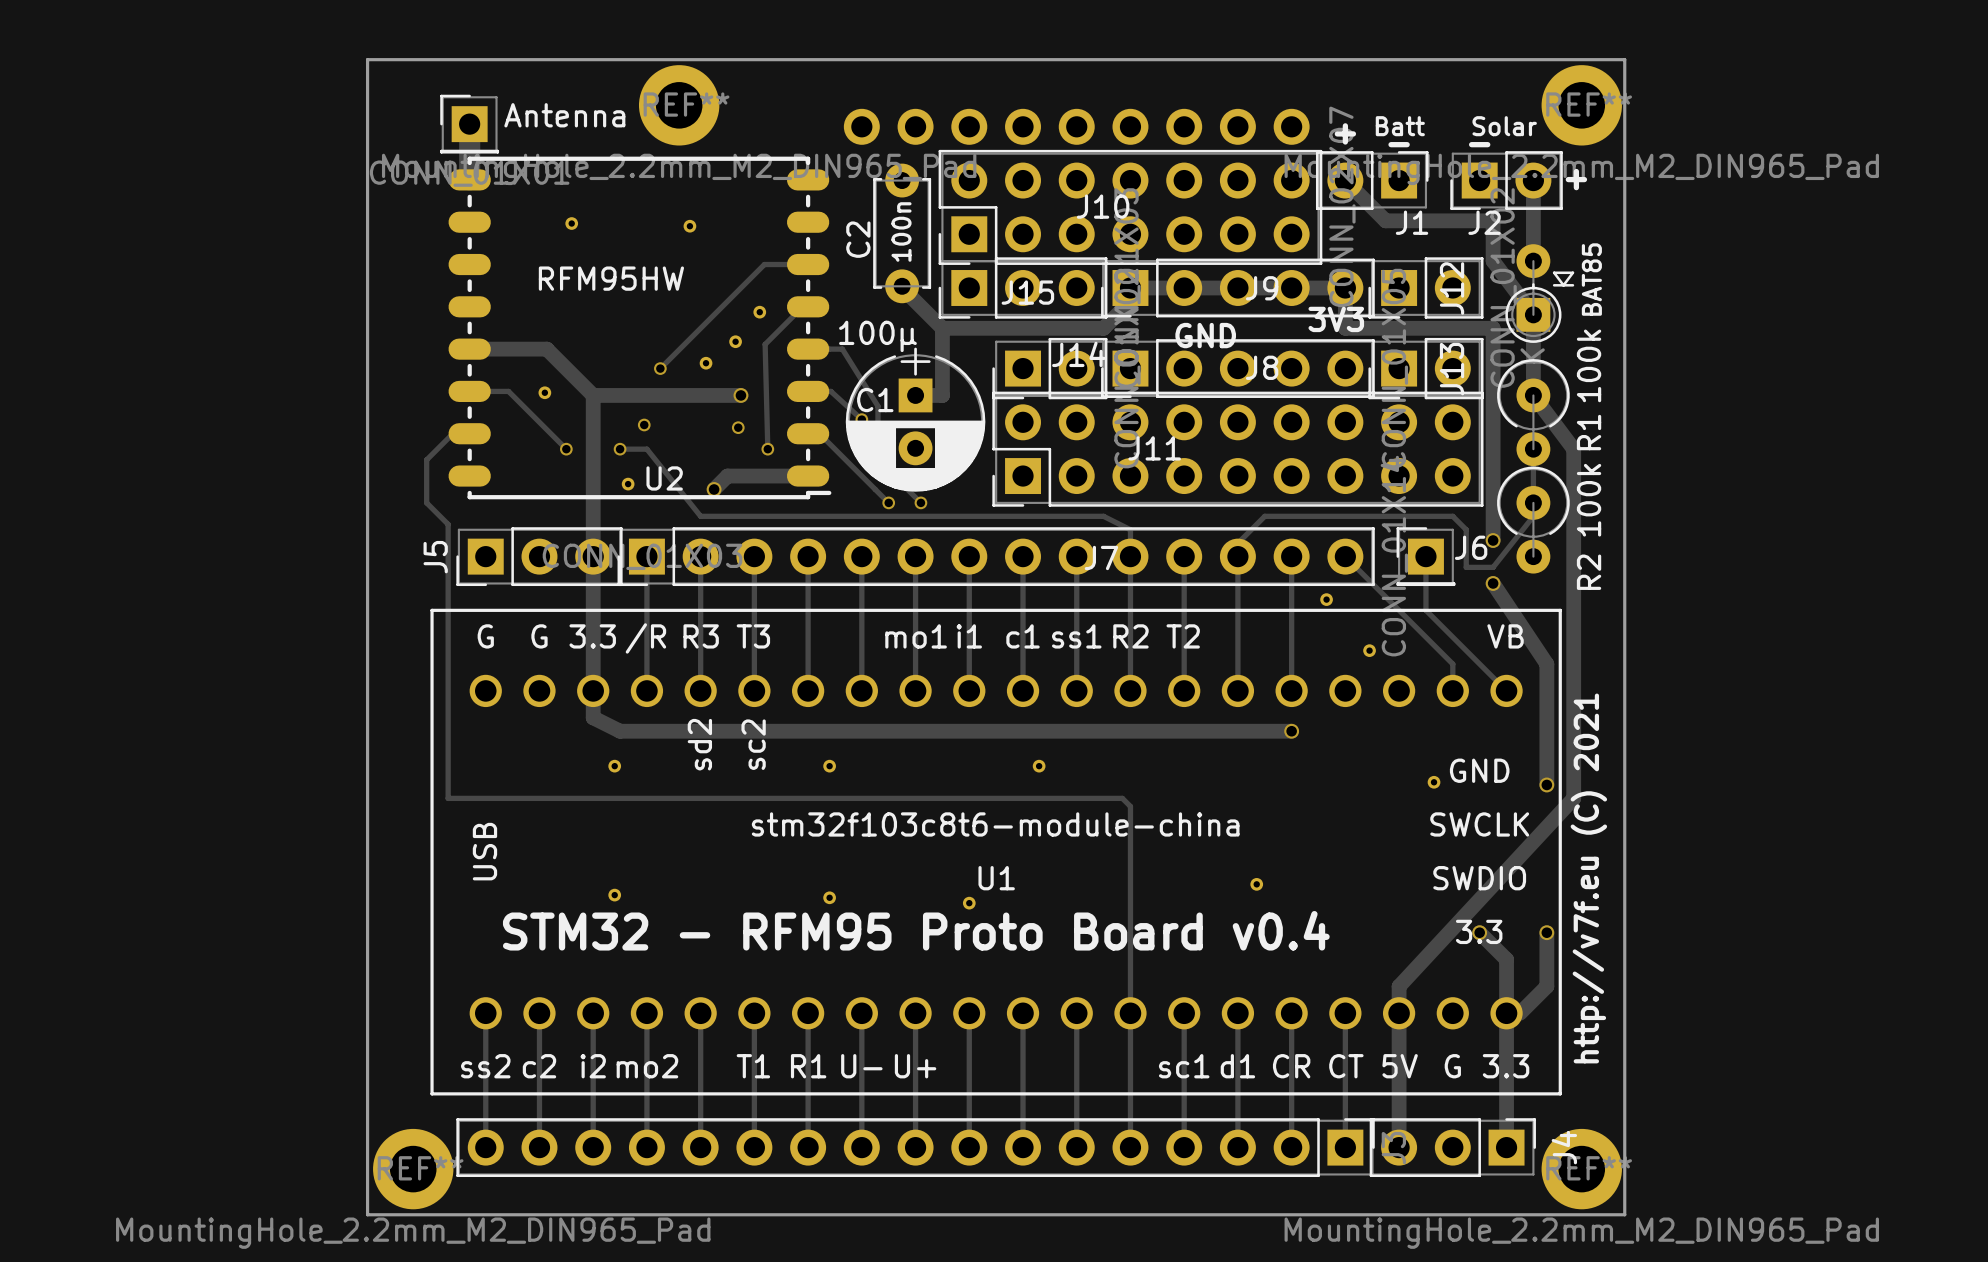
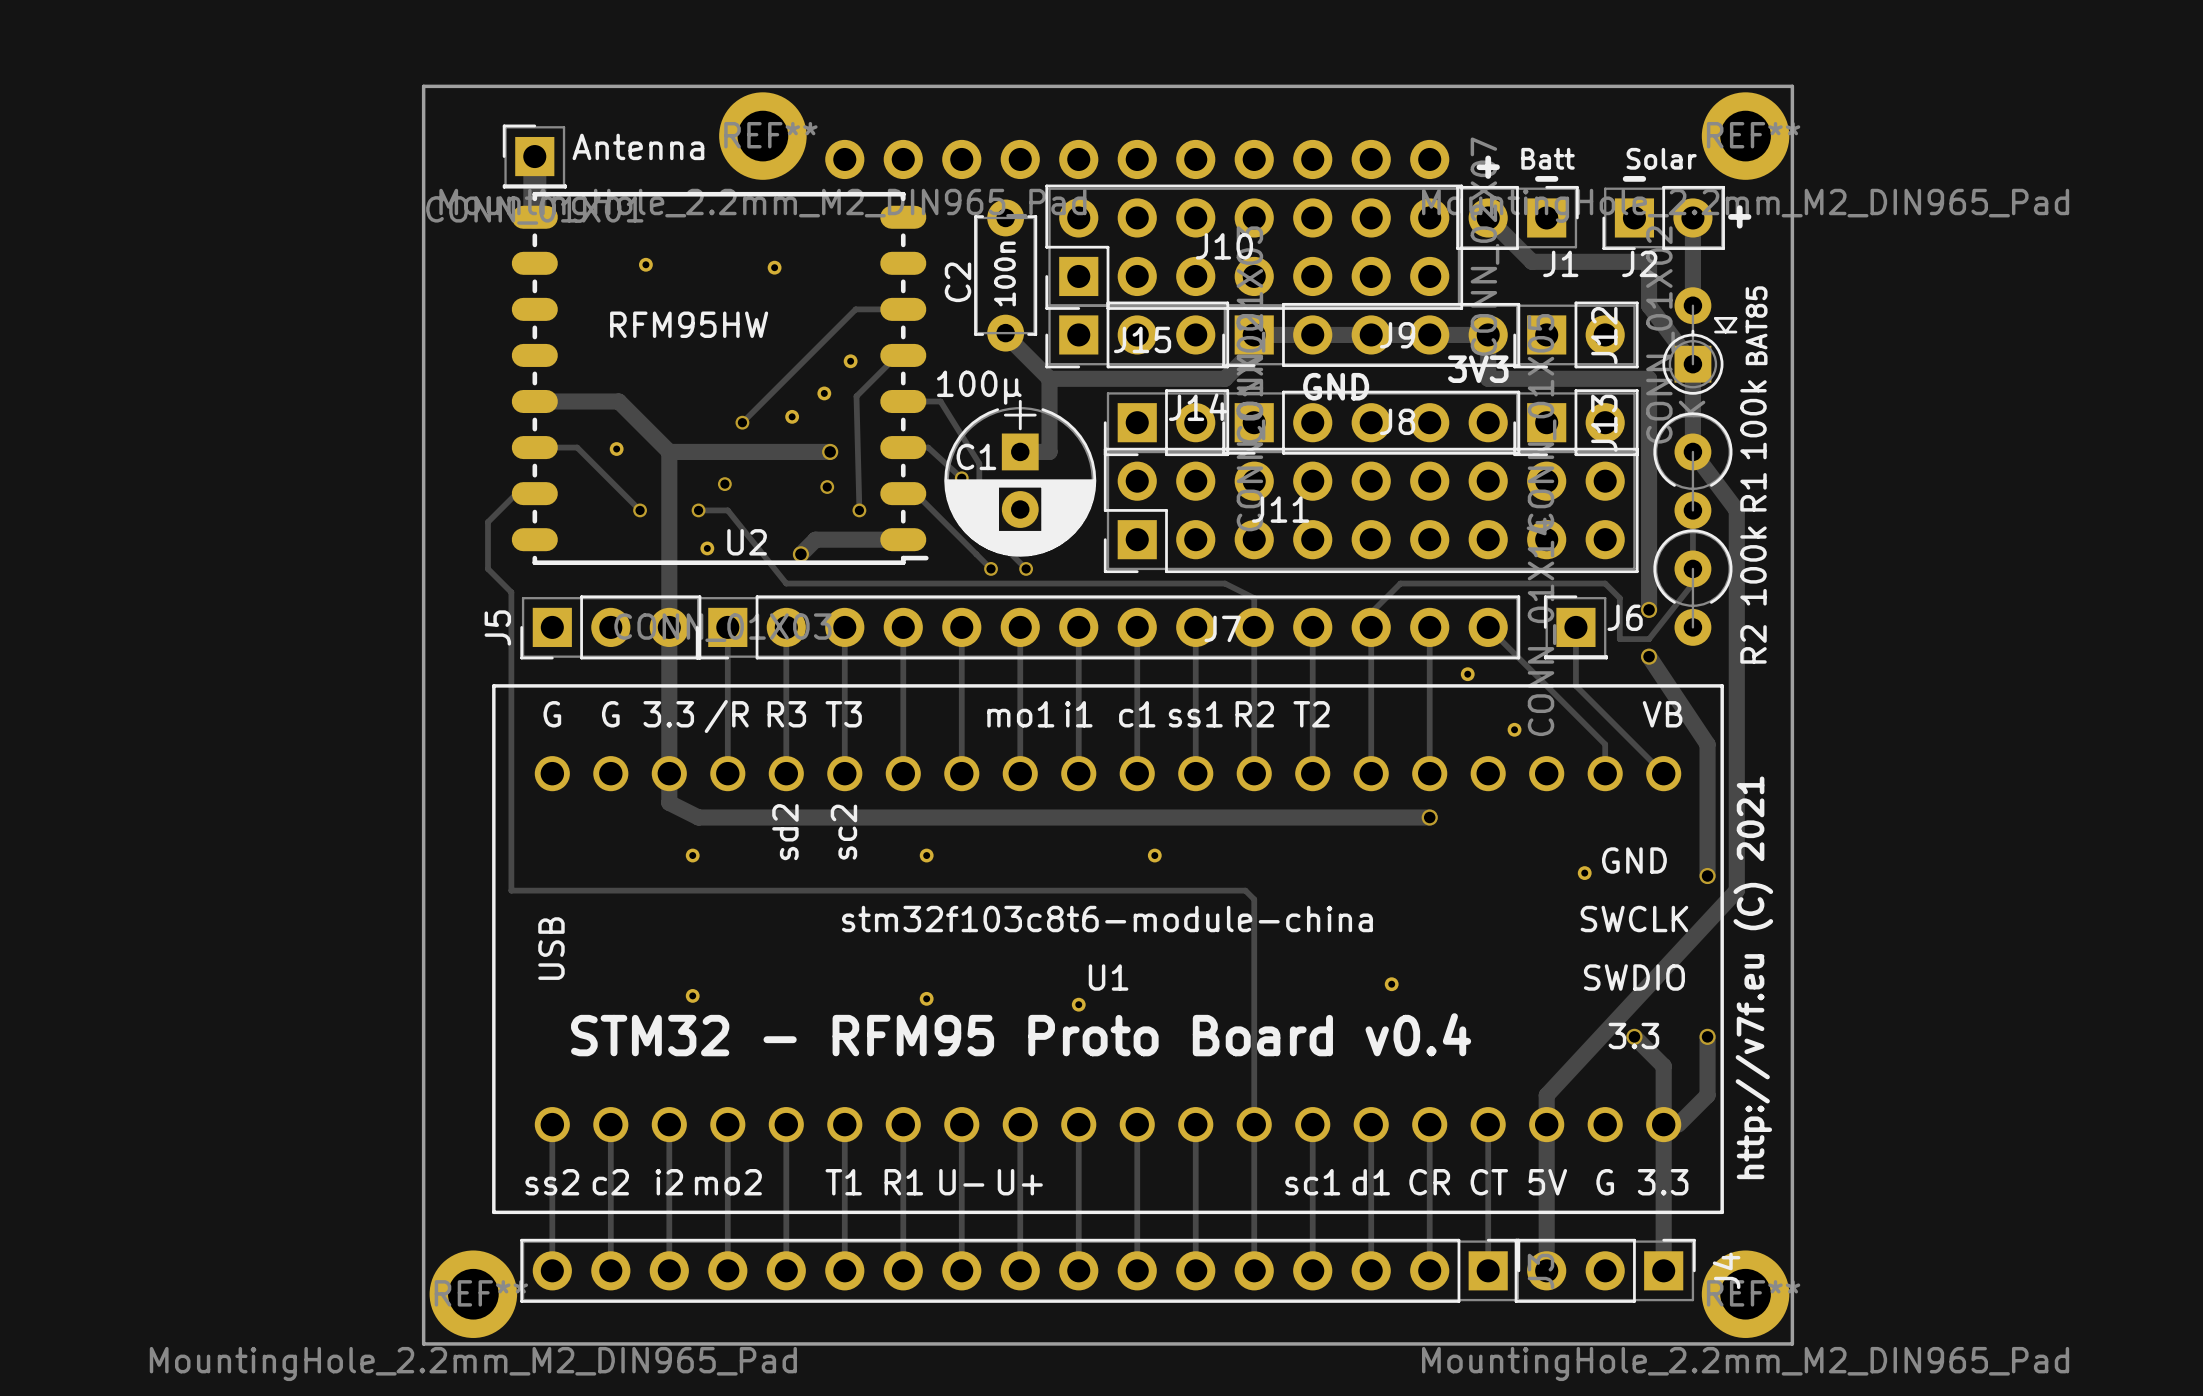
part: none -> (844, 159)
part: none -> (903, 159)

